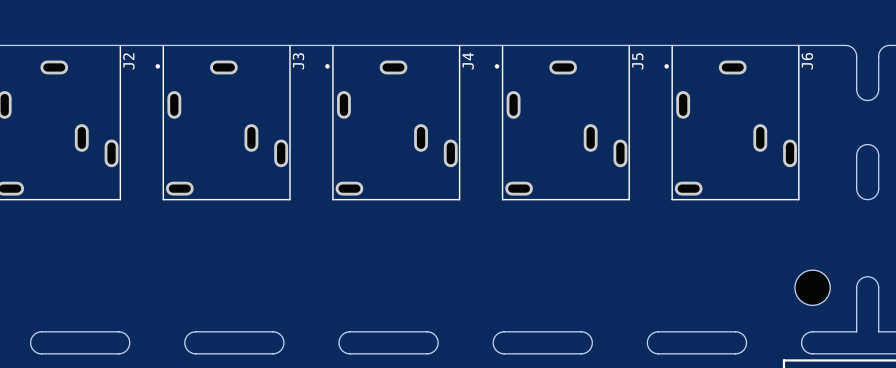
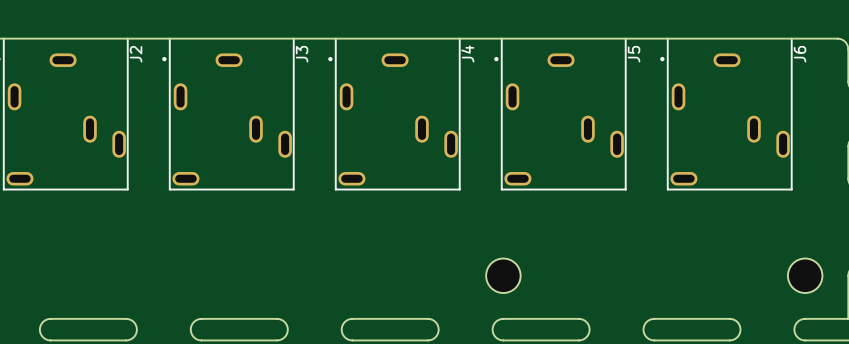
part: none -> (503, 275)

